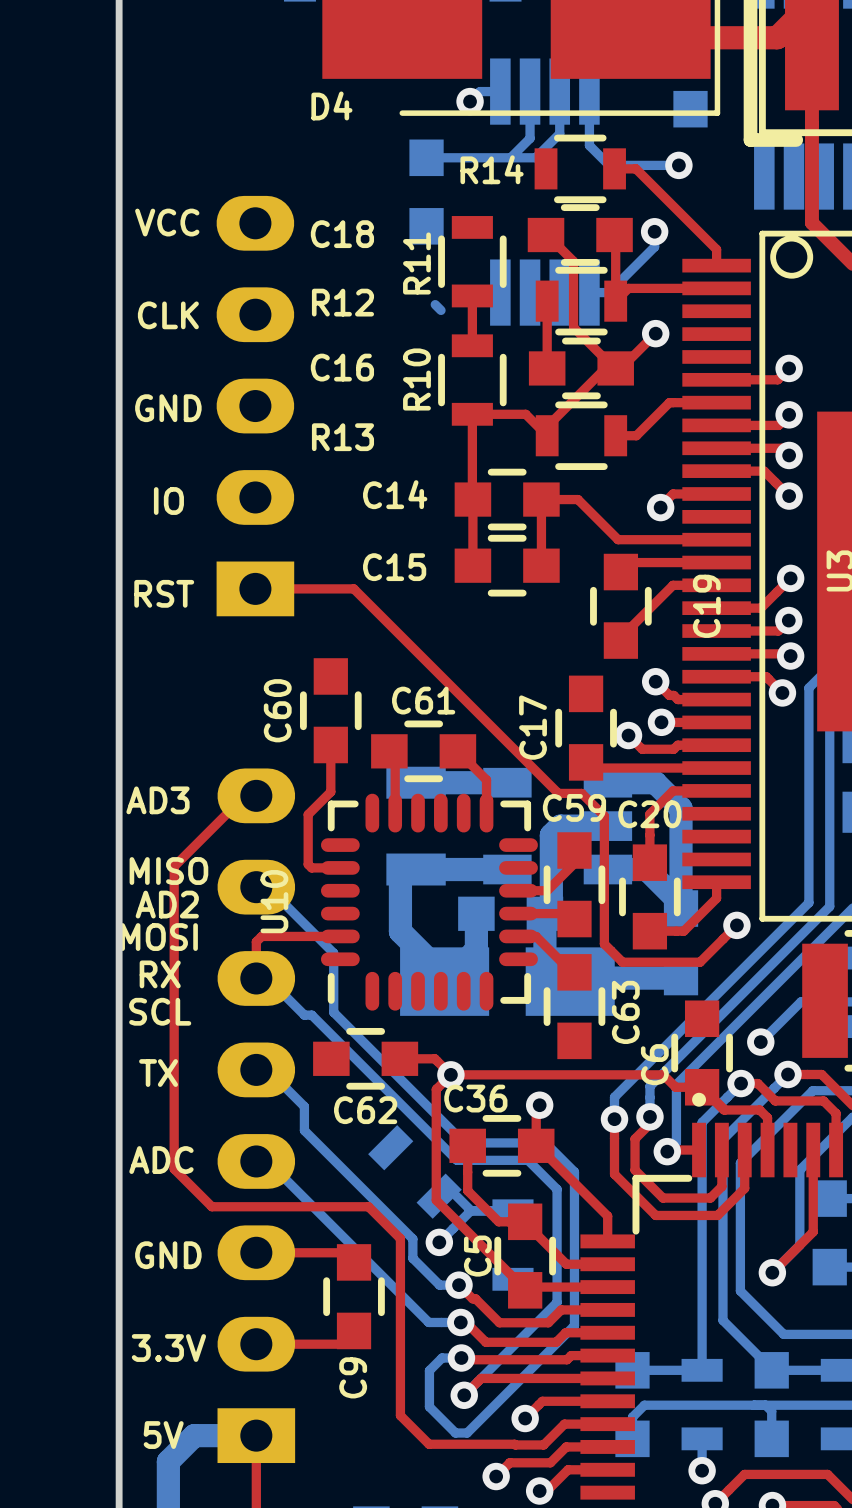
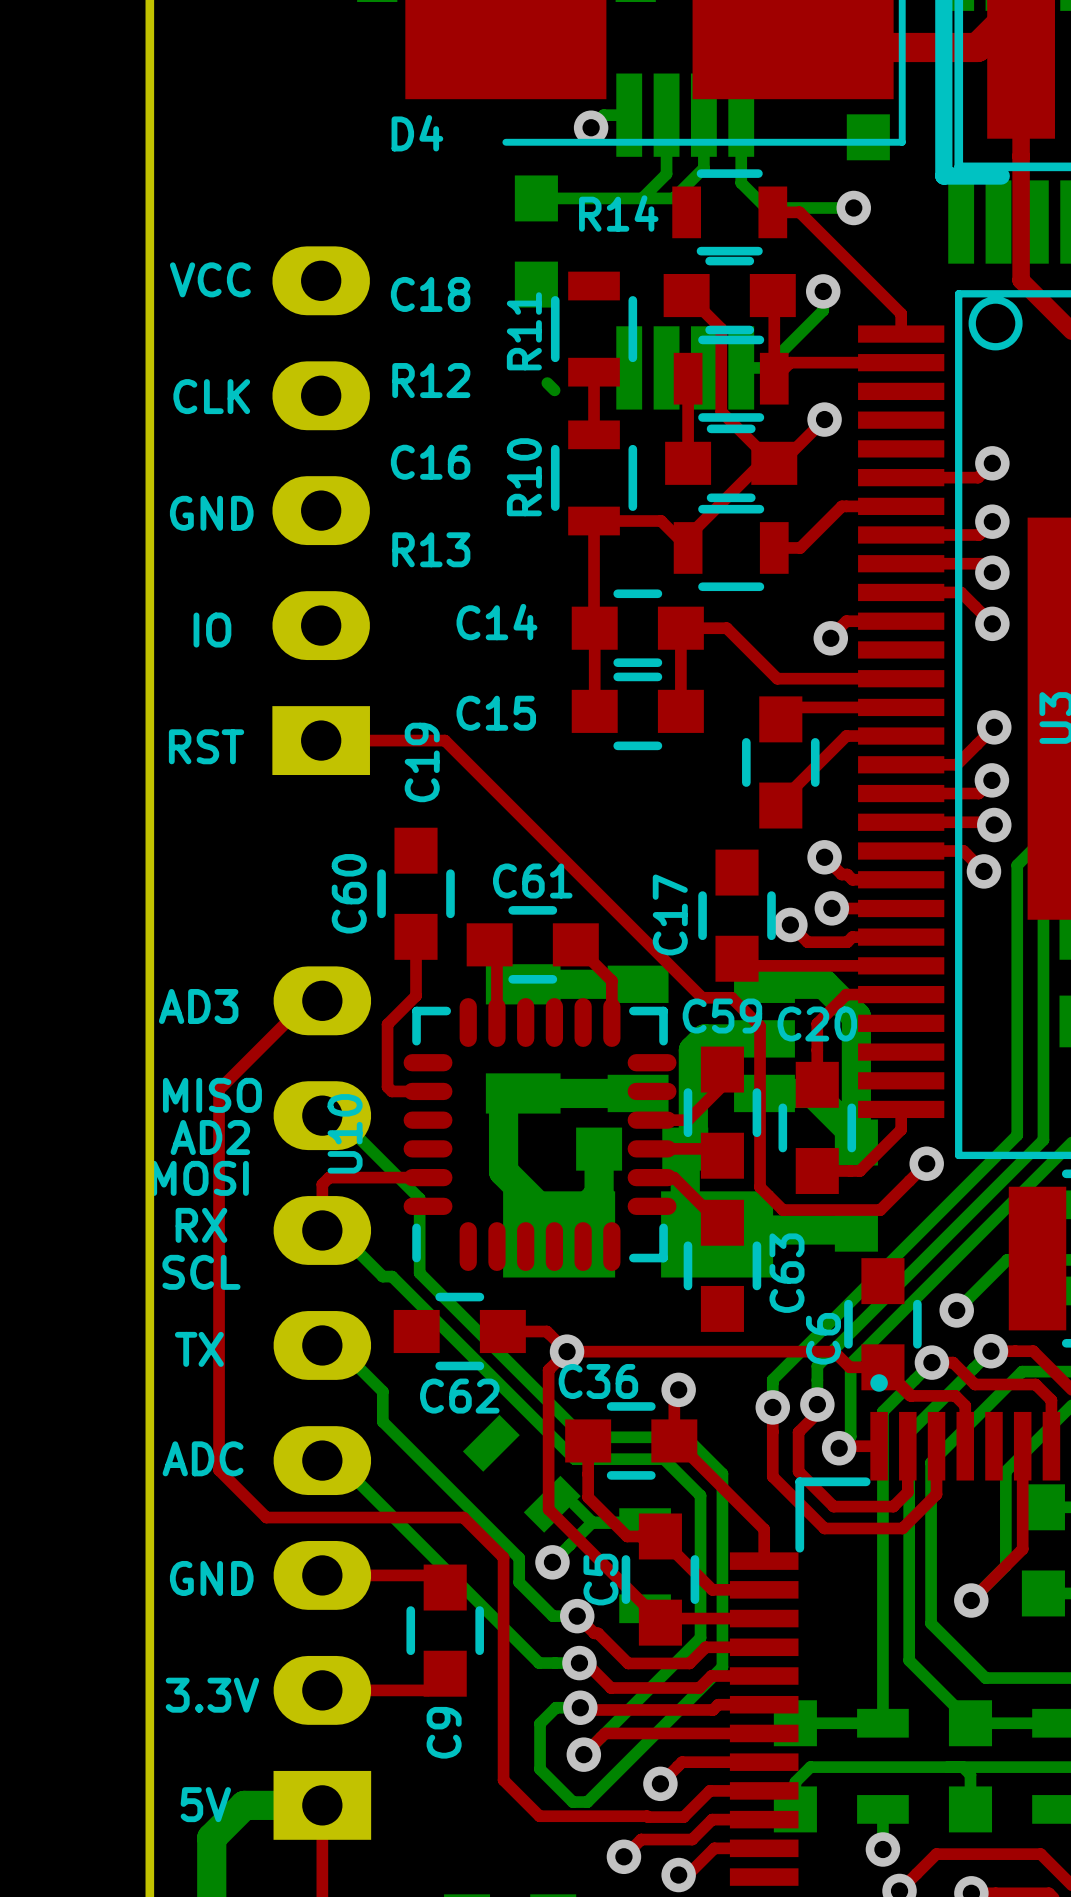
C19 name position: C19 (706, 606) -> C19 (422, 762)

